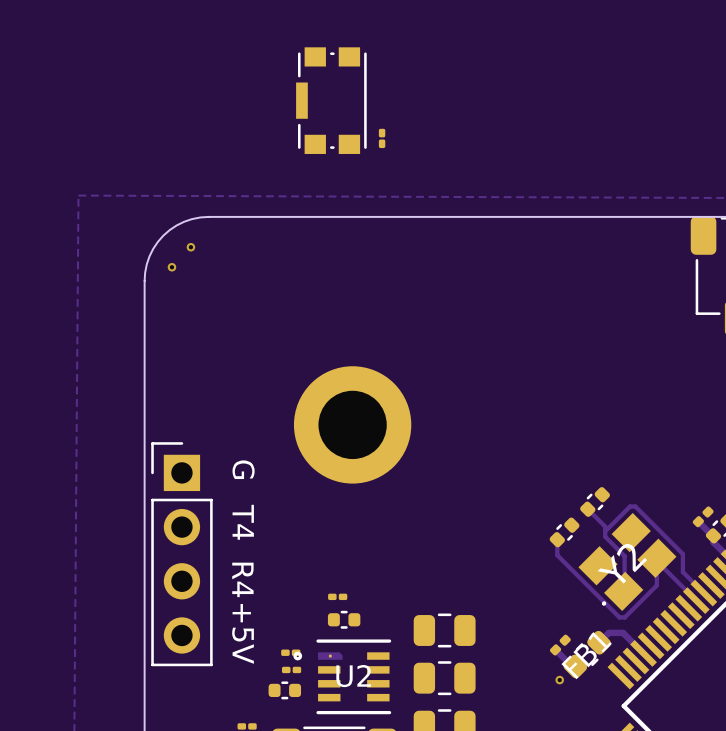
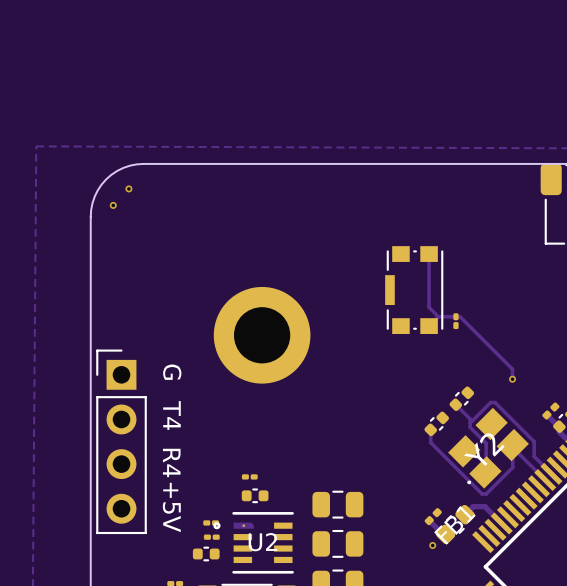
part position: (331, 100) -> (414, 290)
part position: (382, 138) -> (455, 321)
track: none -> (429, 254) (429, 307) (438, 316)
track: none -> (438, 316) (460, 316) (512, 369) (512, 379)
via: none -> (512, 379)

